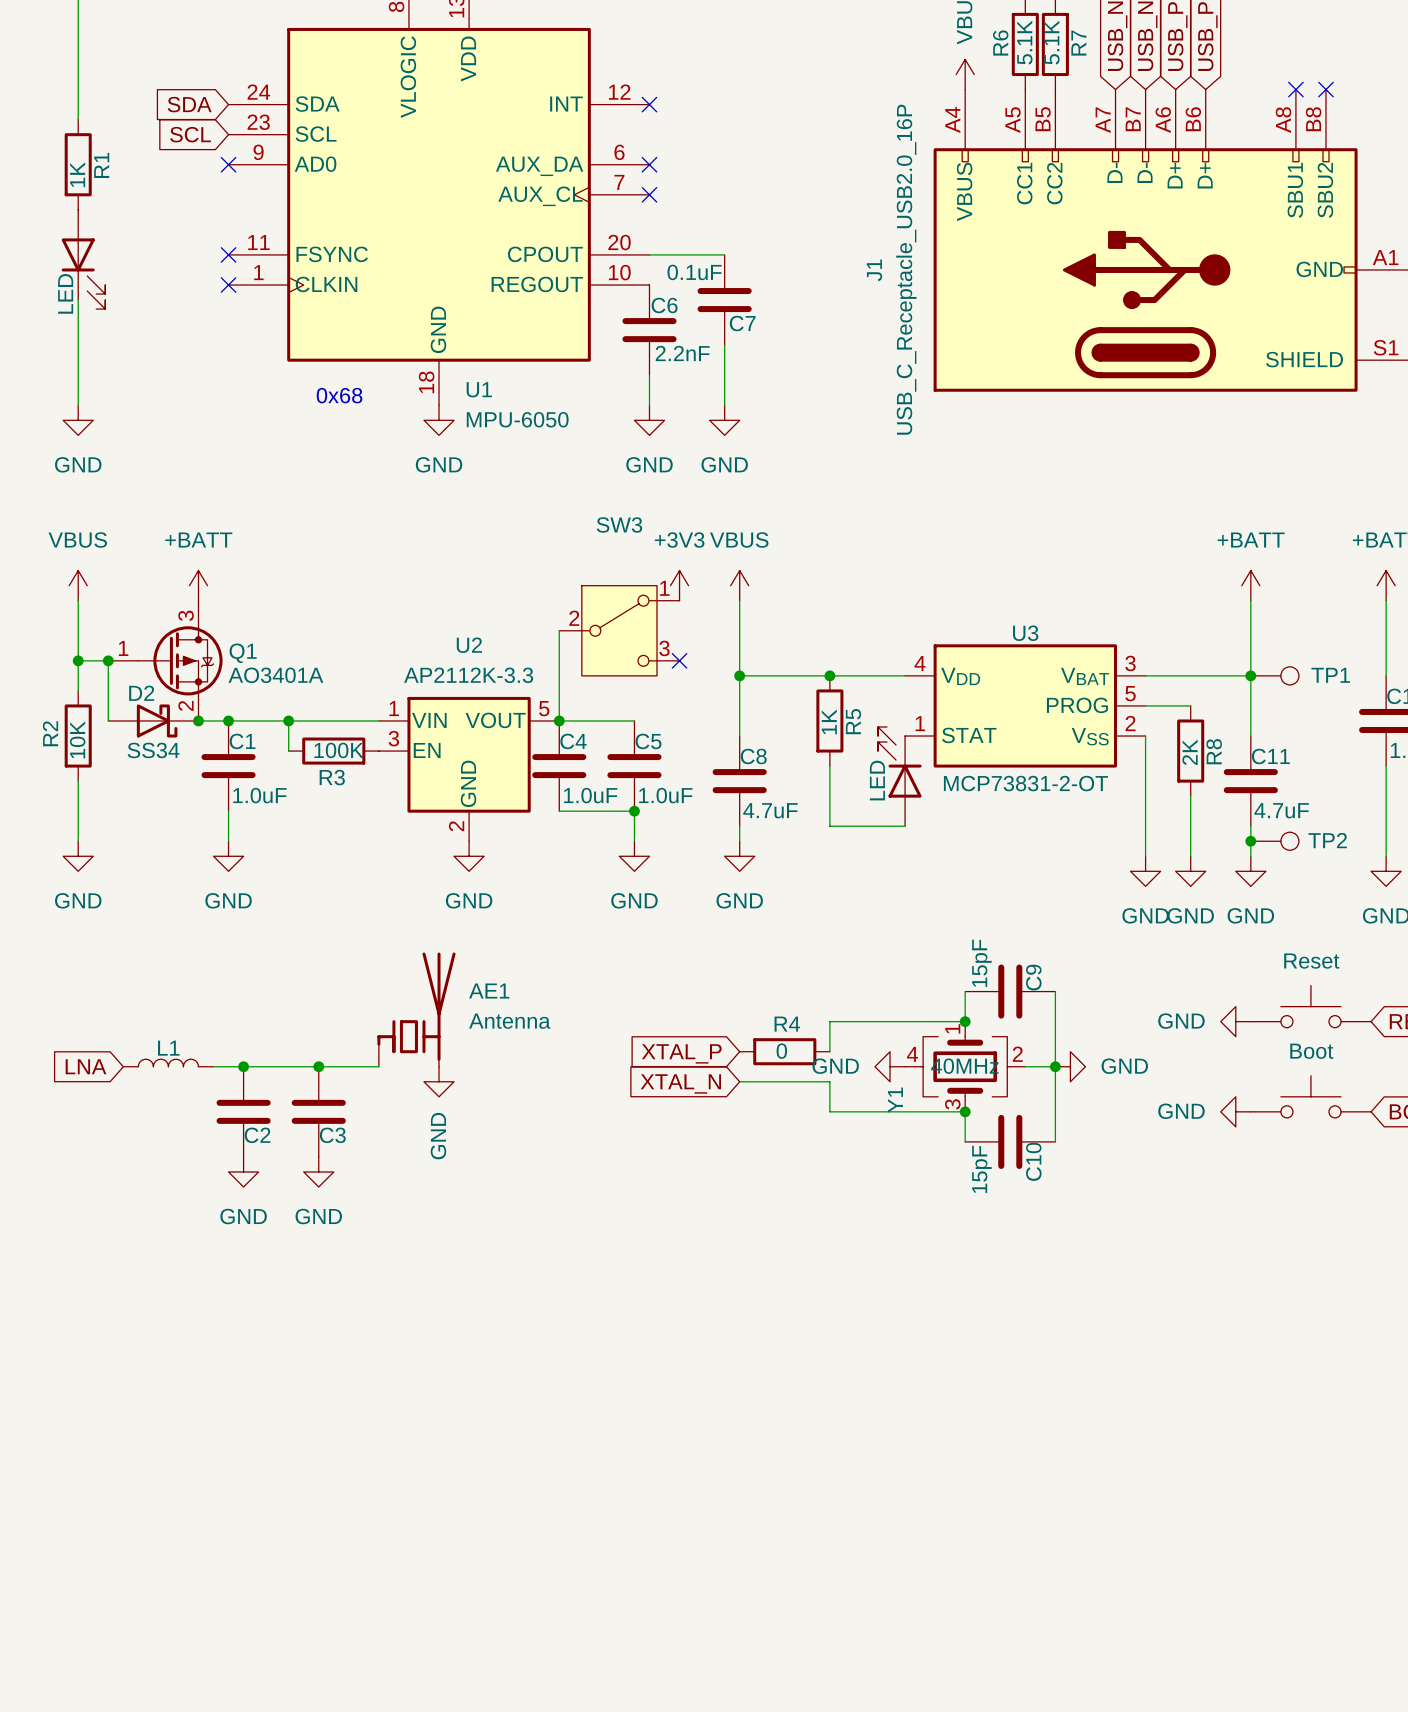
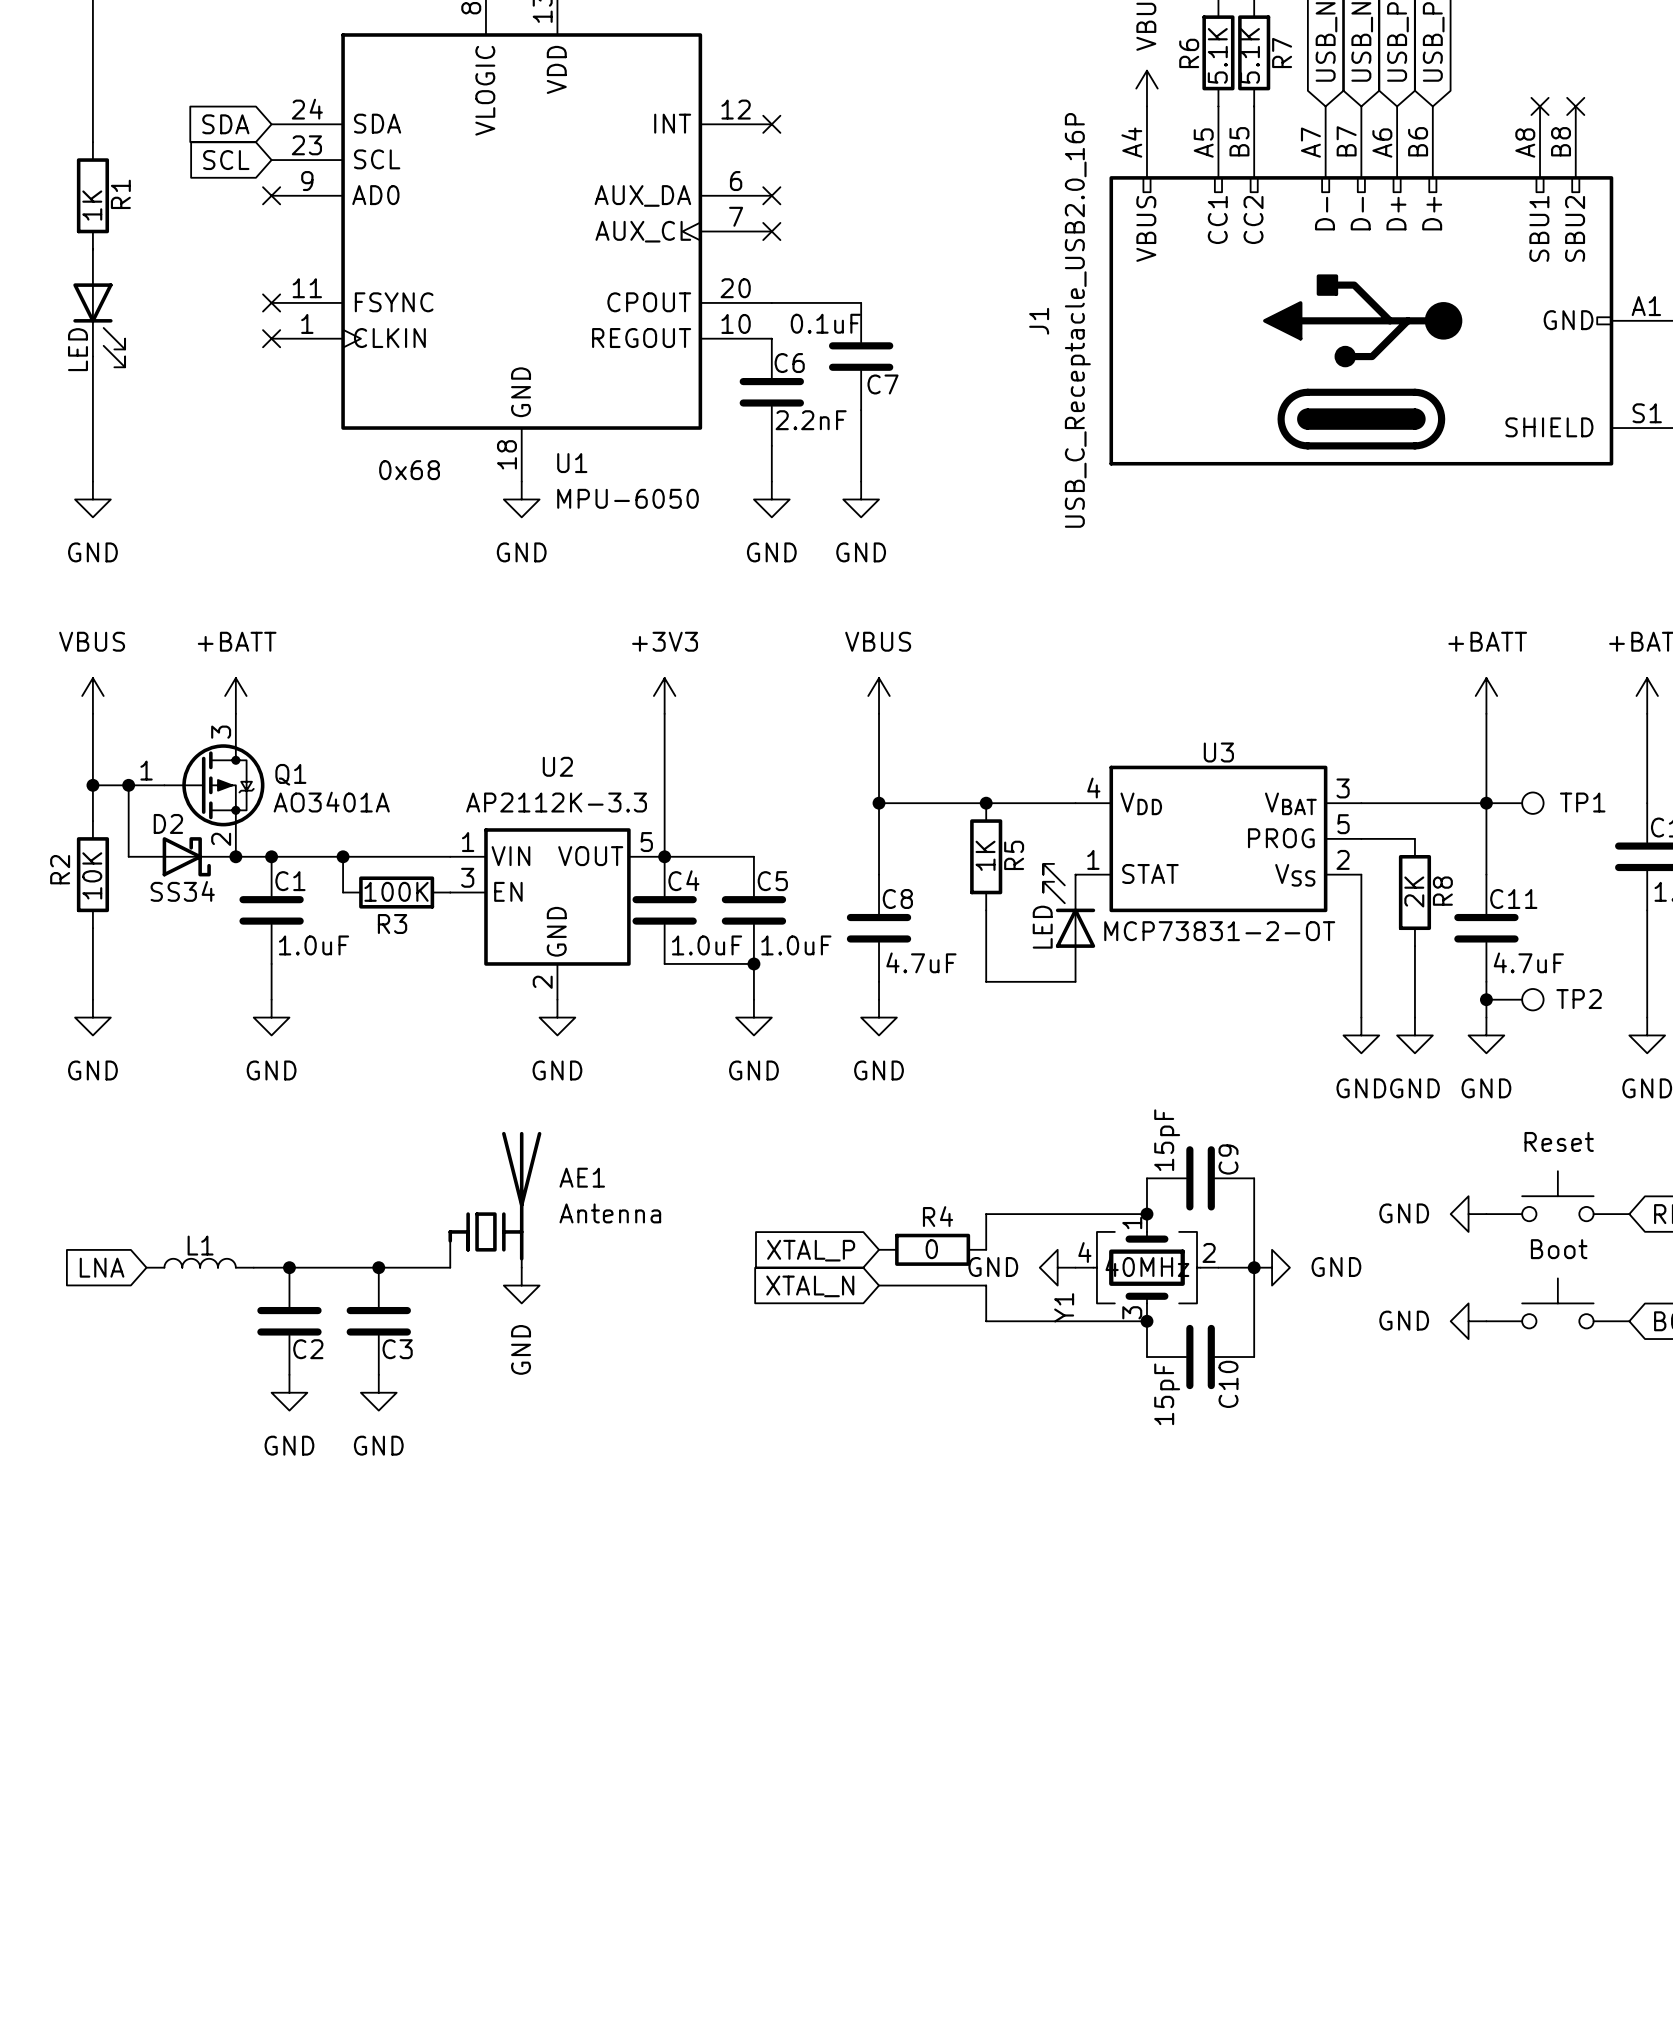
power symbol position: +3V3 (679, 585) -> +3V3 (664, 696)
wire: none -> (664, 713) (664, 749)
SW3: (619, 630) -> none
no-connect mark: (679, 660) -> none

